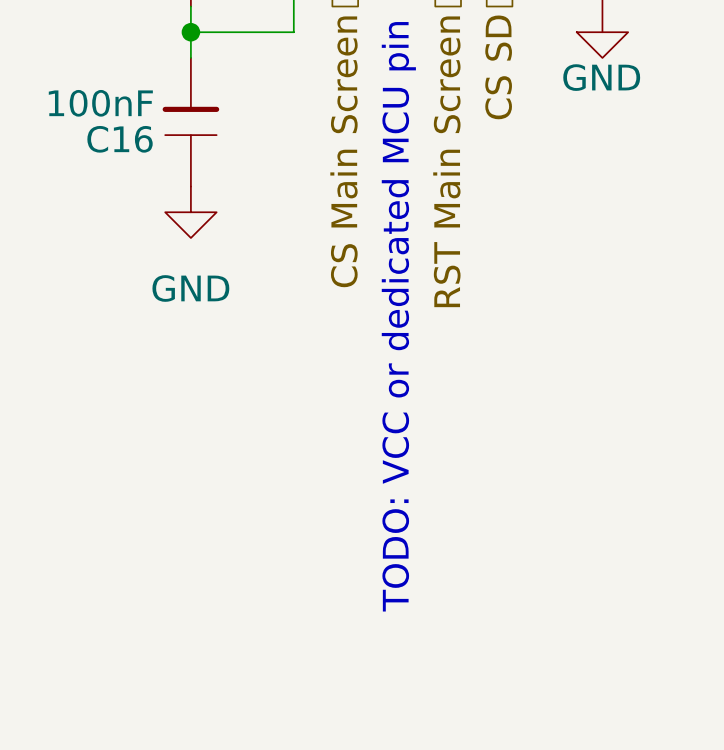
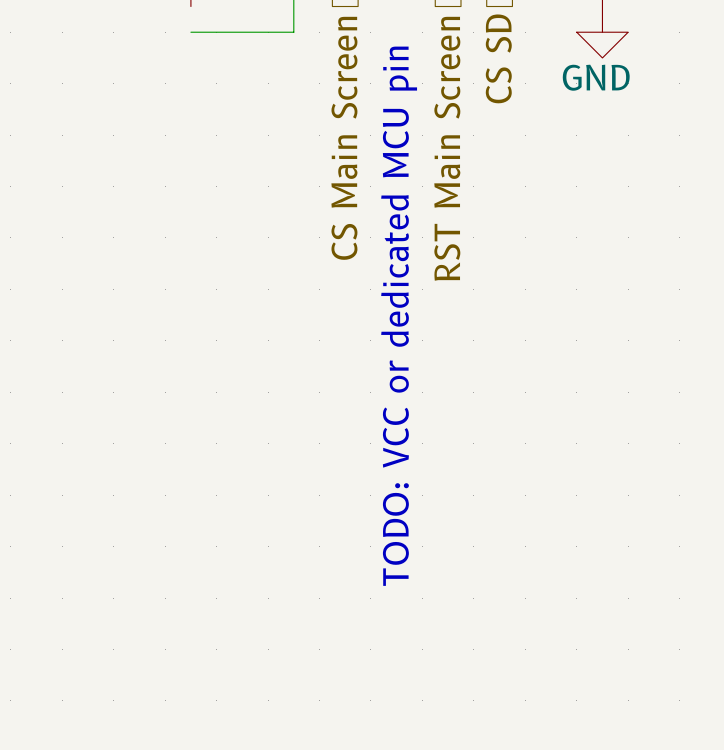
wire: (190, 6) (190, 57) -> none
junction: (190, 32) -> none
C16: 100nF (190, 122) -> none
power symbol: GND (190, 212) -> none

